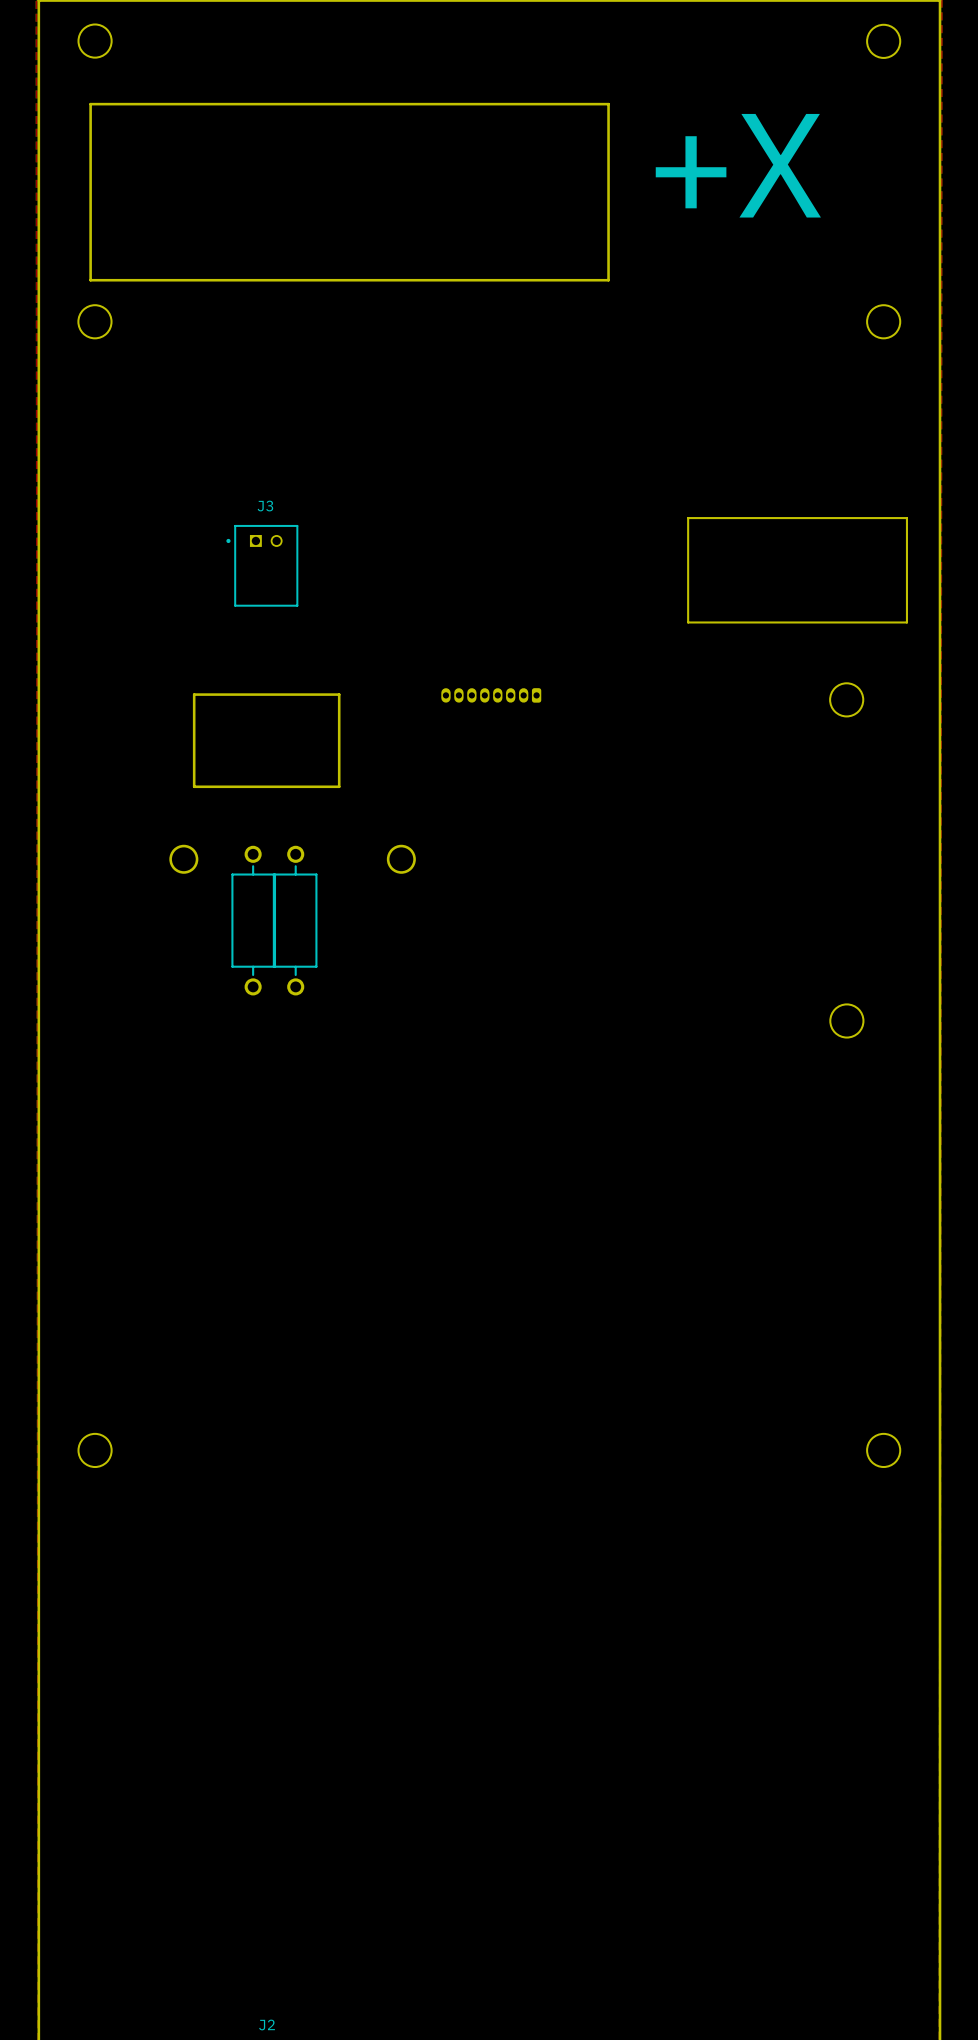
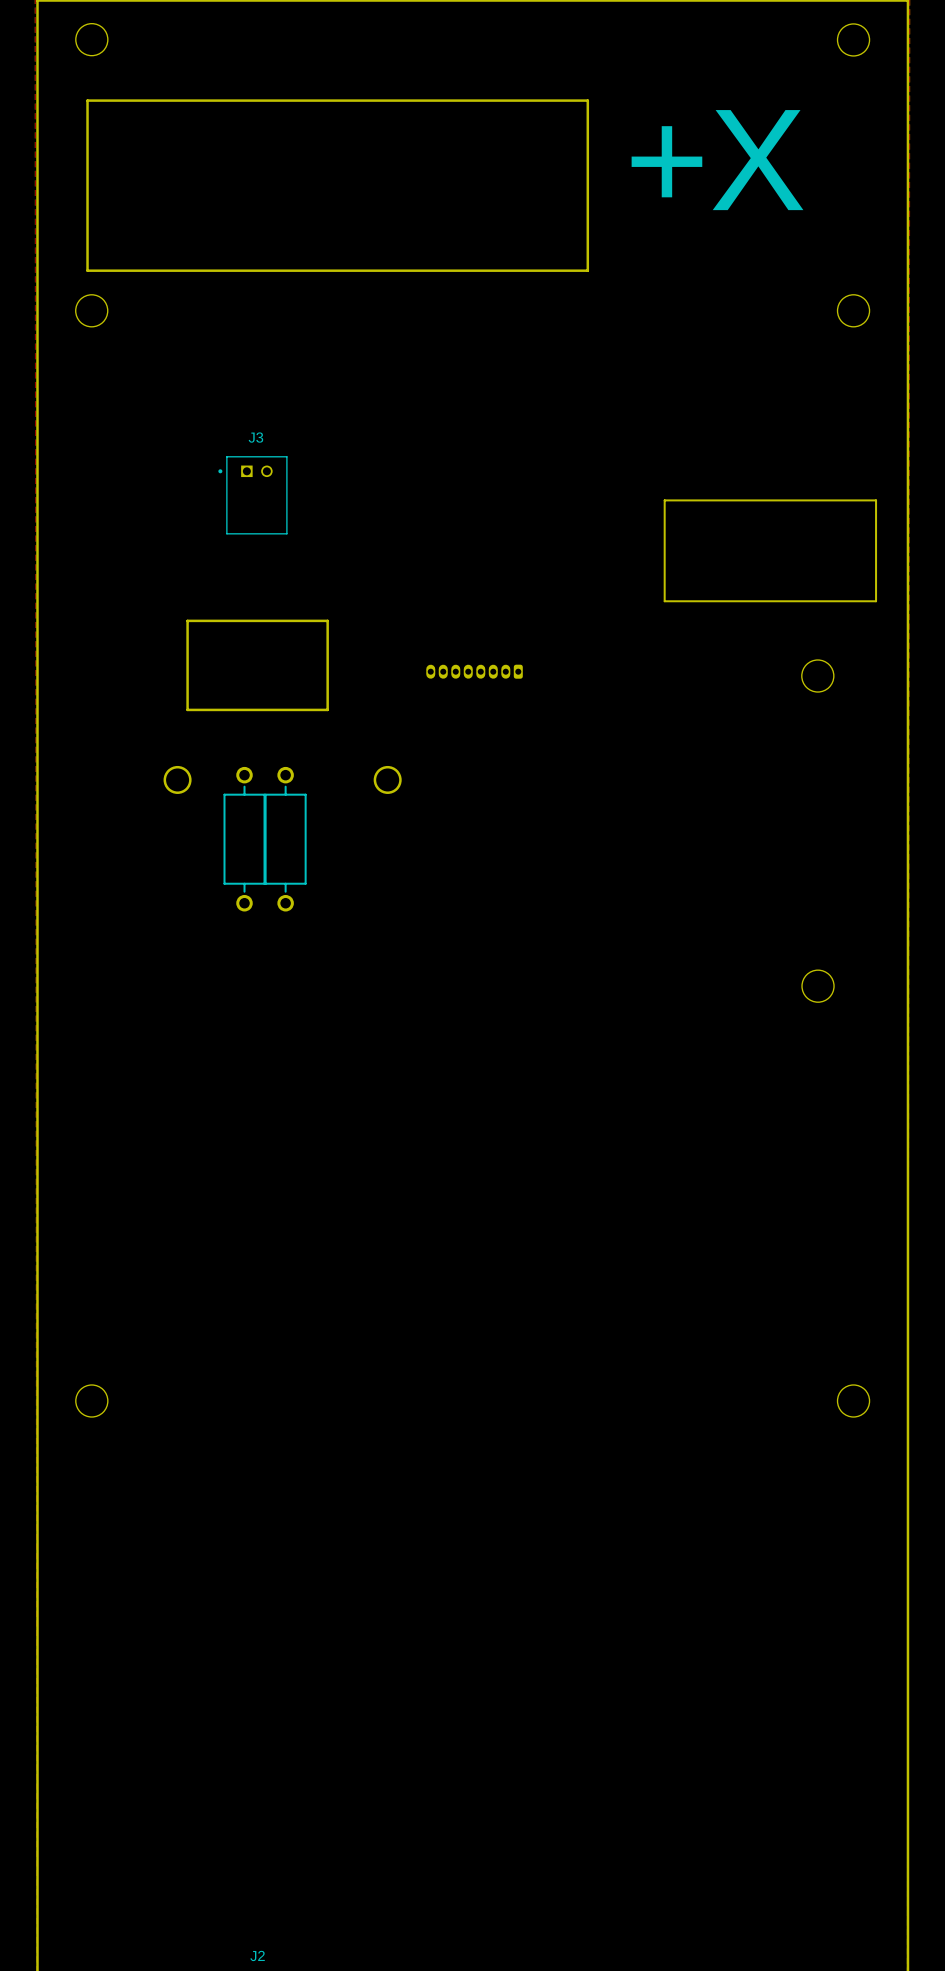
J3 position: (262, 565) -> (252, 495)
board edge: (194, 694) (339, 694) -> (187, 670) (187, 620) (327, 620) (327, 670)
board edge: (194, 734) (194, 786) (339, 786) (339, 734) -> (187, 709) (327, 709)
round board edge position: (183, 859) -> (177, 779)
round board edge position: (401, 859) -> (387, 779)
part: none -> (244, 839)
part: none -> (285, 839)
part: (253, 920) -> none
part: (295, 920) -> none

